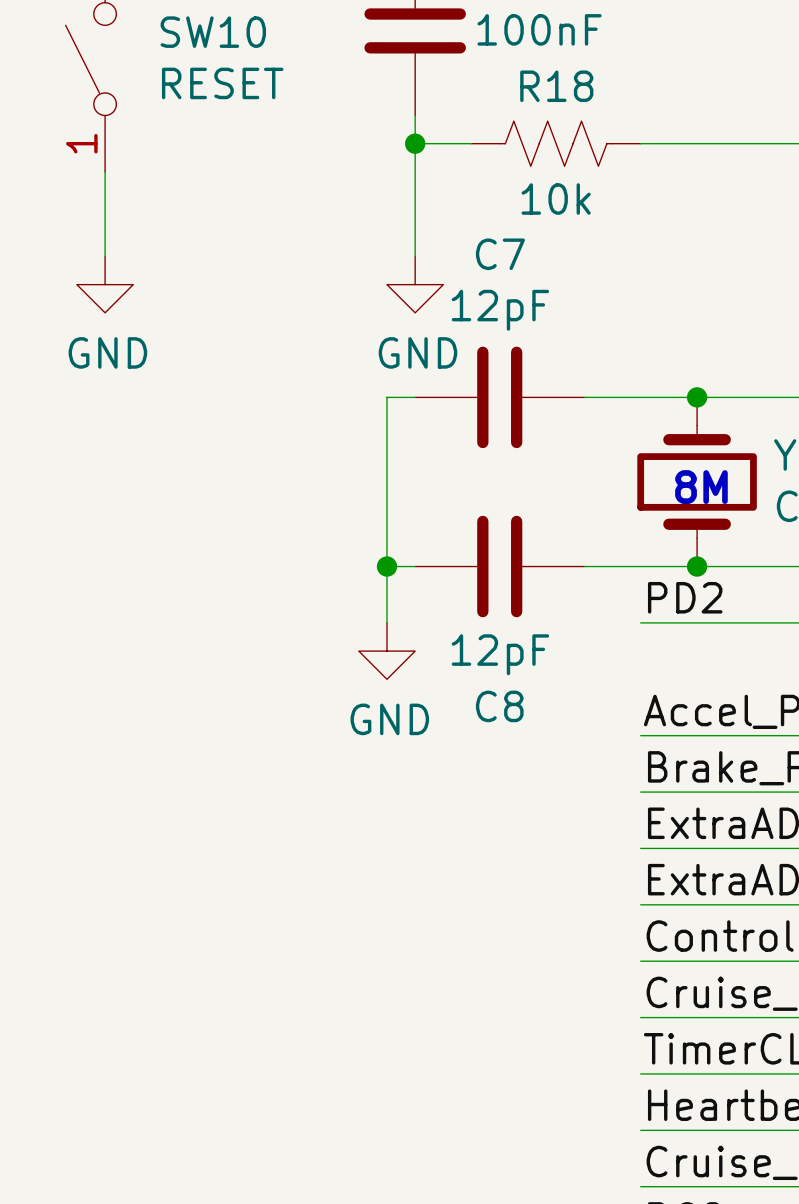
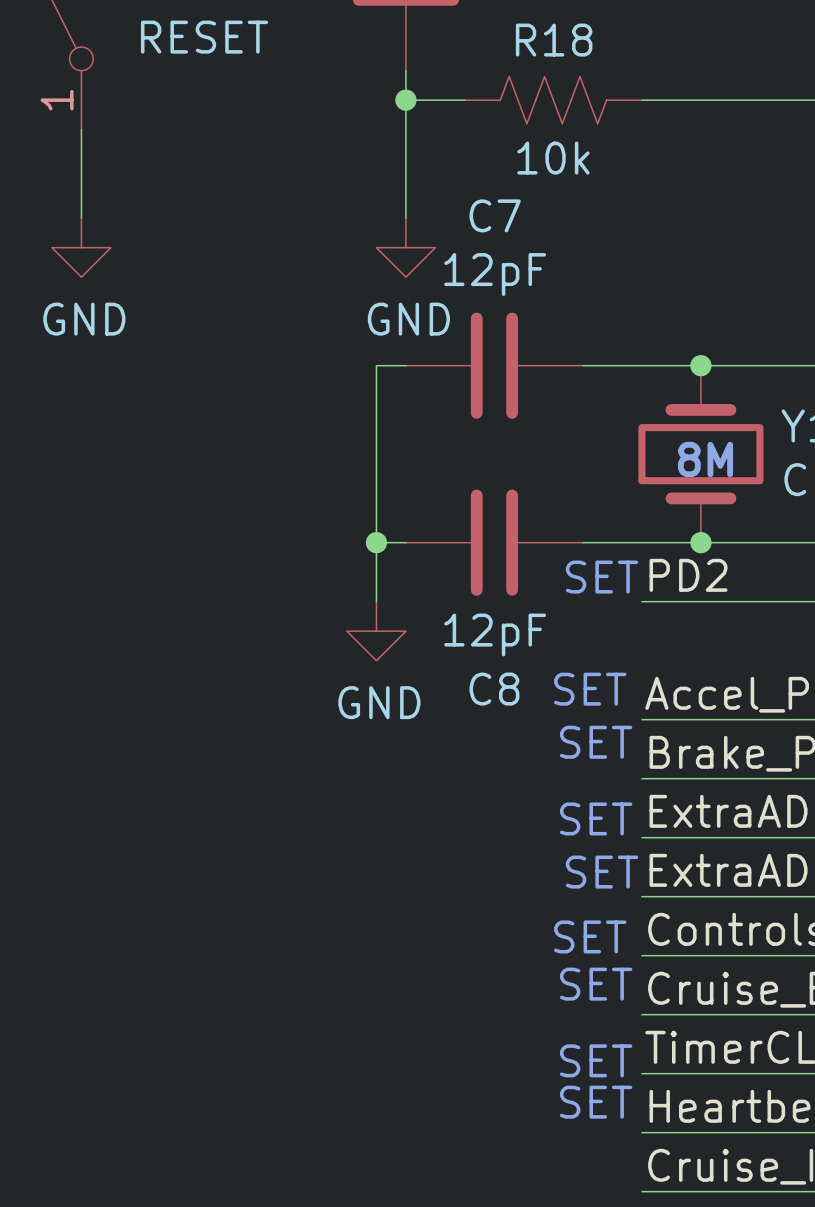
text: none -> SET (602, 577)
text: none -> SET (590, 689)
text: none -> SET (596, 742)
text: none -> SET (596, 818)
text: none -> SET (602, 872)
text: none -> SET (590, 936)
text: none -> SET (596, 984)
text: none -> SET (596, 1060)
text: none -> SET (596, 1102)

